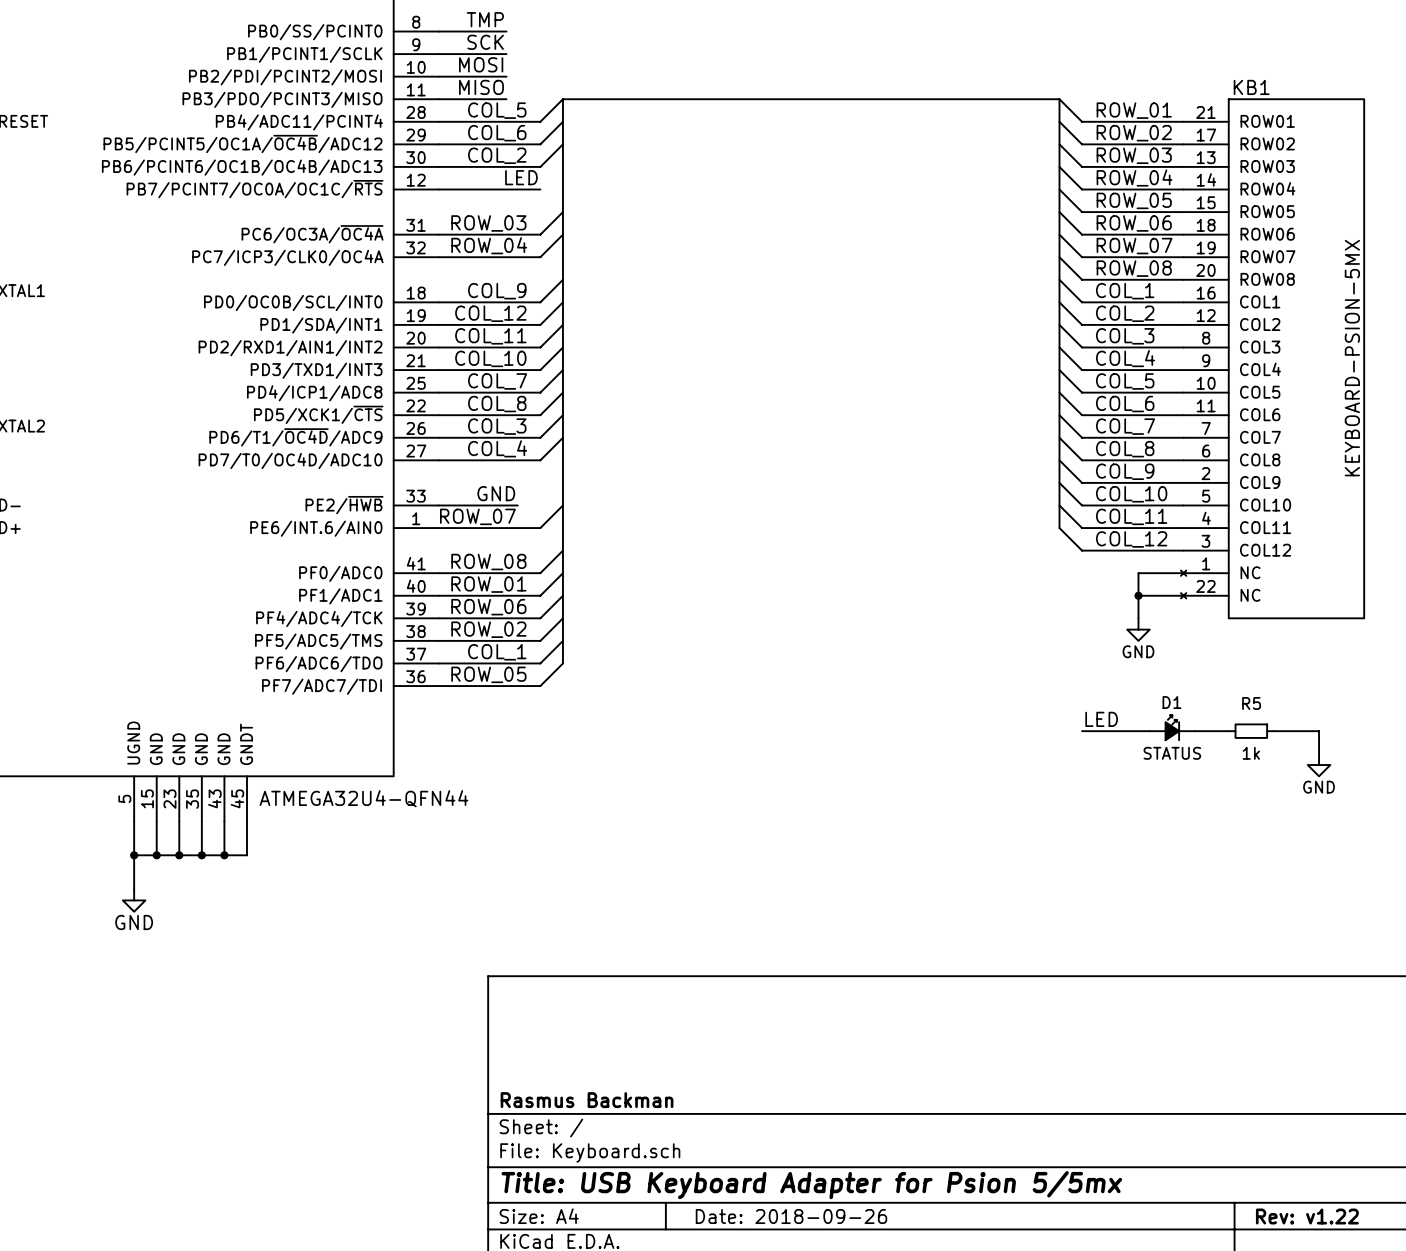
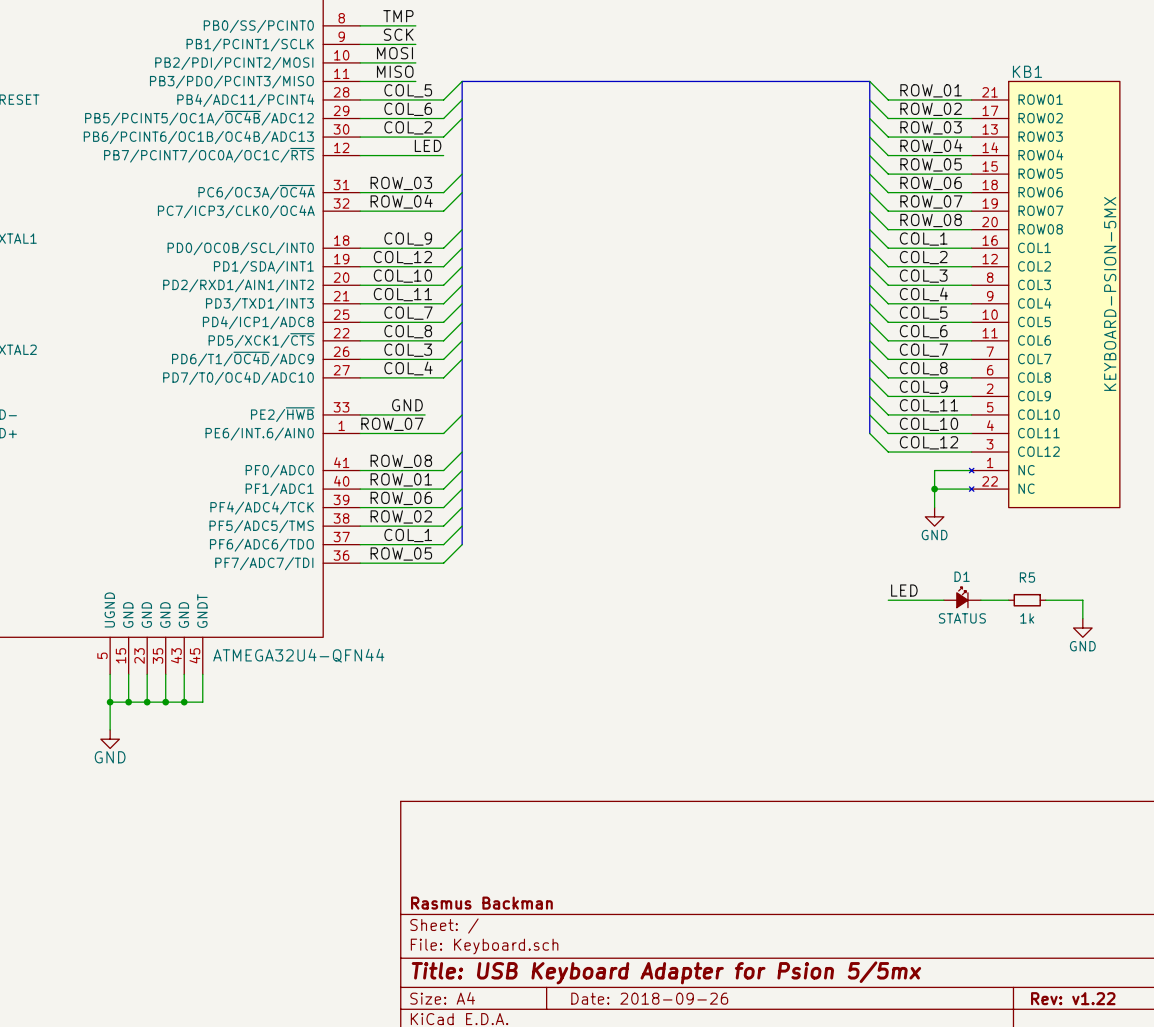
label: COL_11 (490, 336) -> COL_10 (402, 276)
label: COL_10 (490, 358) -> COL_11 (402, 294)
label: COL_10 (1131, 494) -> COL_11 (928, 405)
label: COL_11 (1131, 516) -> COL_10 (928, 424)

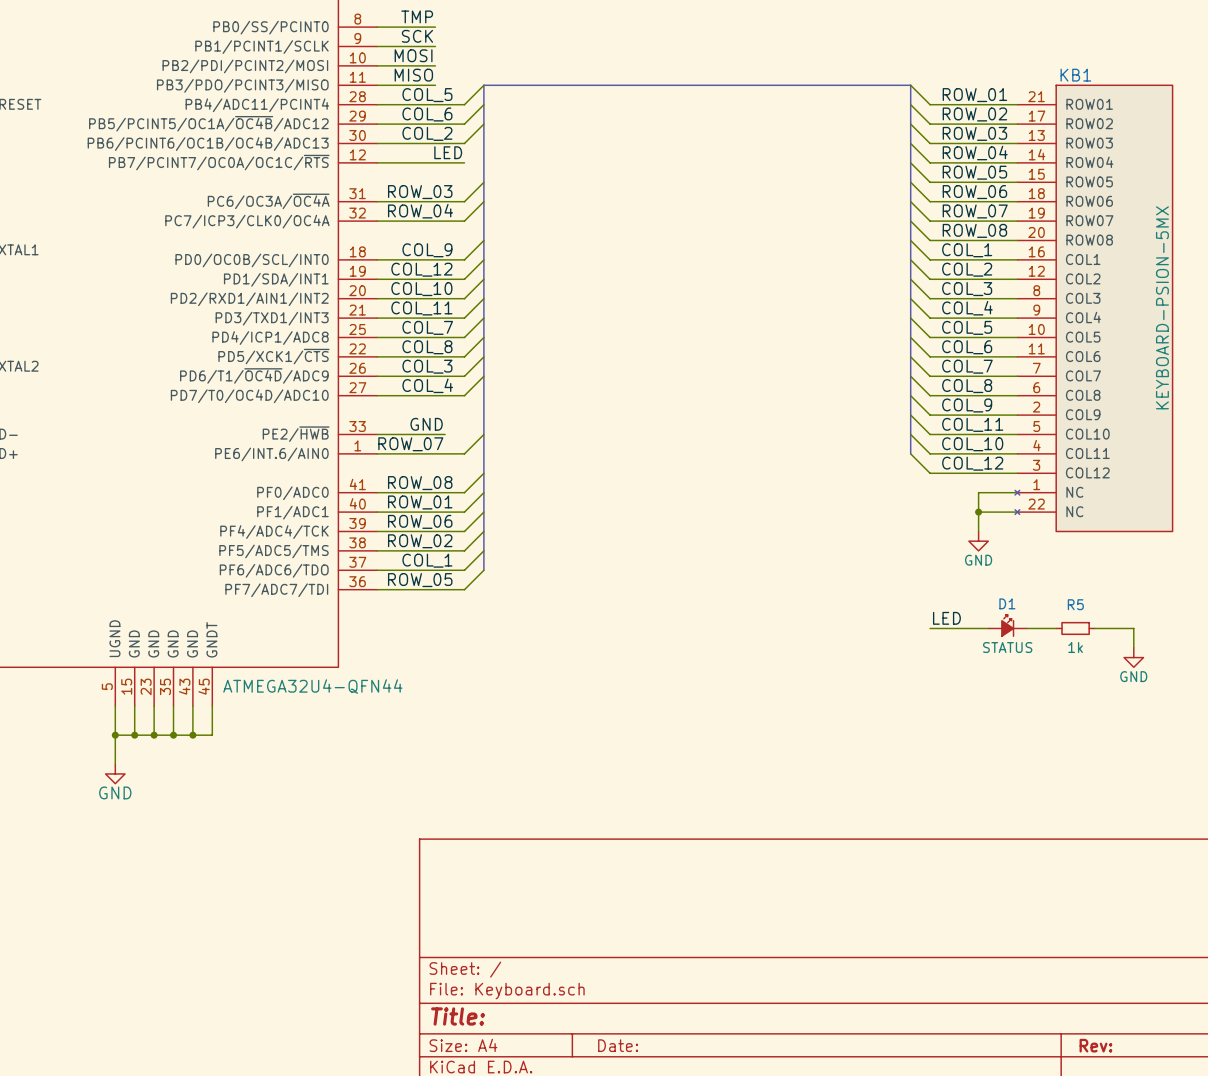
title block: Rasmus Backman (481, 903) -> none
title block: Title: USB Keyboard Adapter for Psion 5/5mx (666, 972) -> Title: (458, 1016)
title block: Date: 2018-09-26 (649, 998) -> Date: (618, 1045)
title block: Rev: v1.22 (1073, 998) -> Rev: (1095, 1045)

